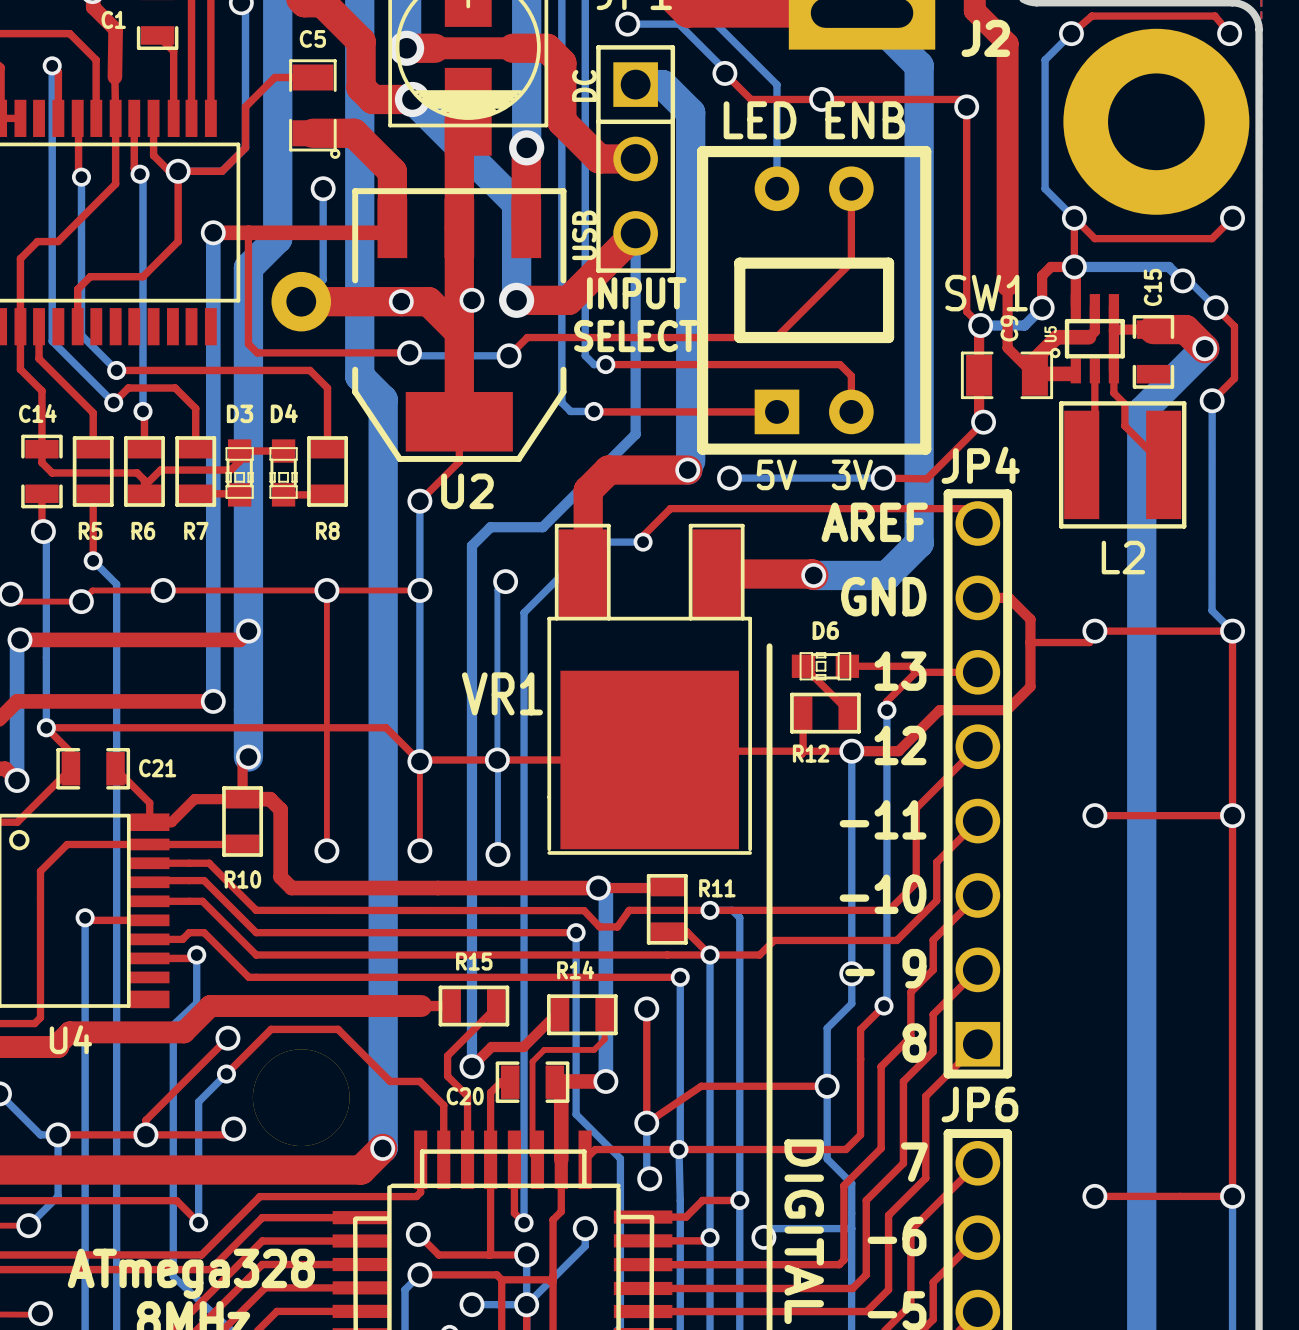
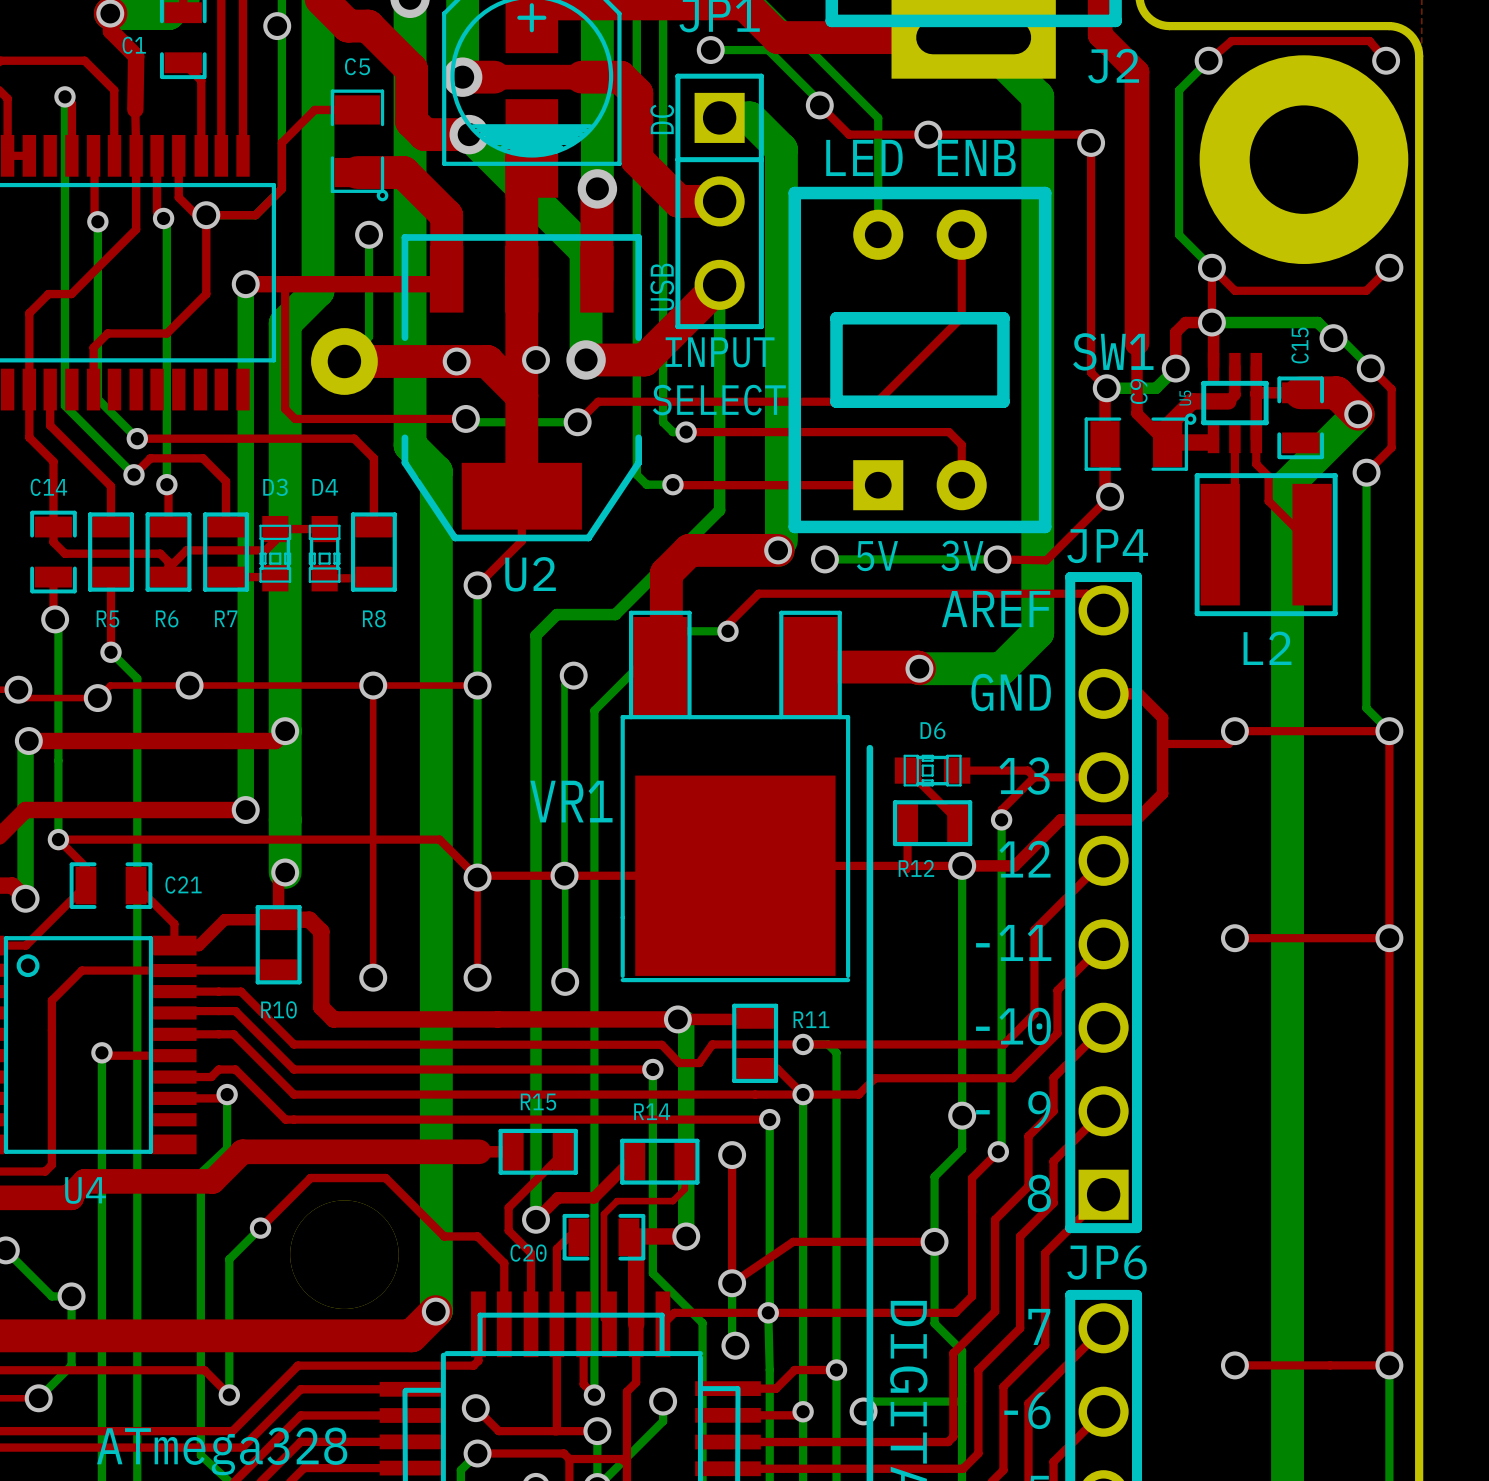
top track: (227, 1038) (145, 1120) (145, 1134) -> none
via: (227, 1038) -> none
top track: (233, 1129) (227, 1134) (58, 1134) -> none
via: (233, 1129) -> none
via: (145, 1134) -> none

